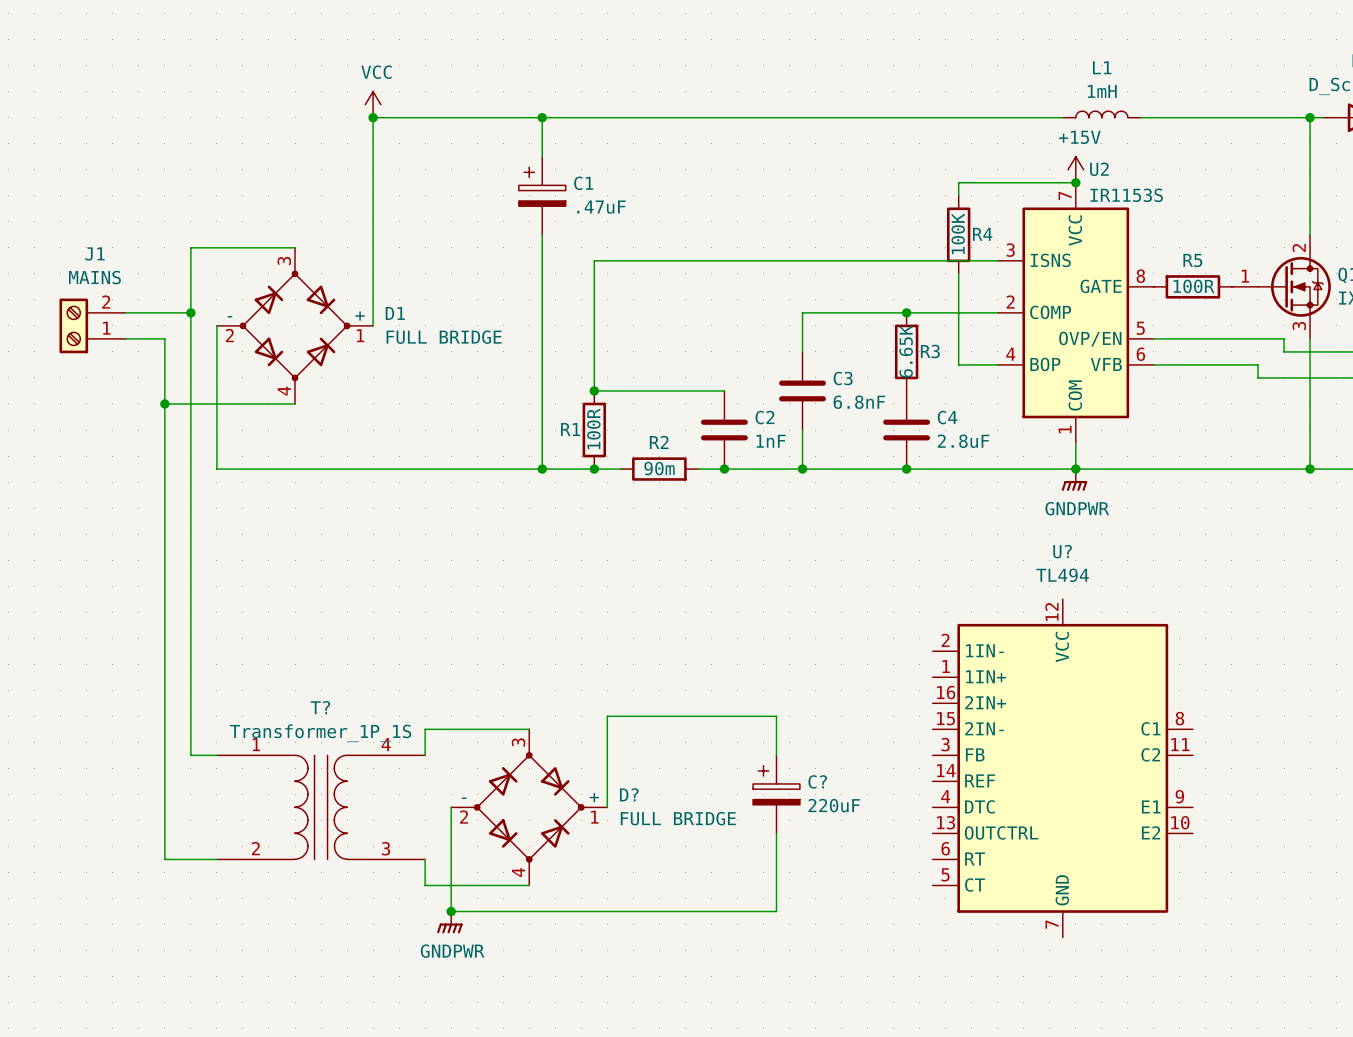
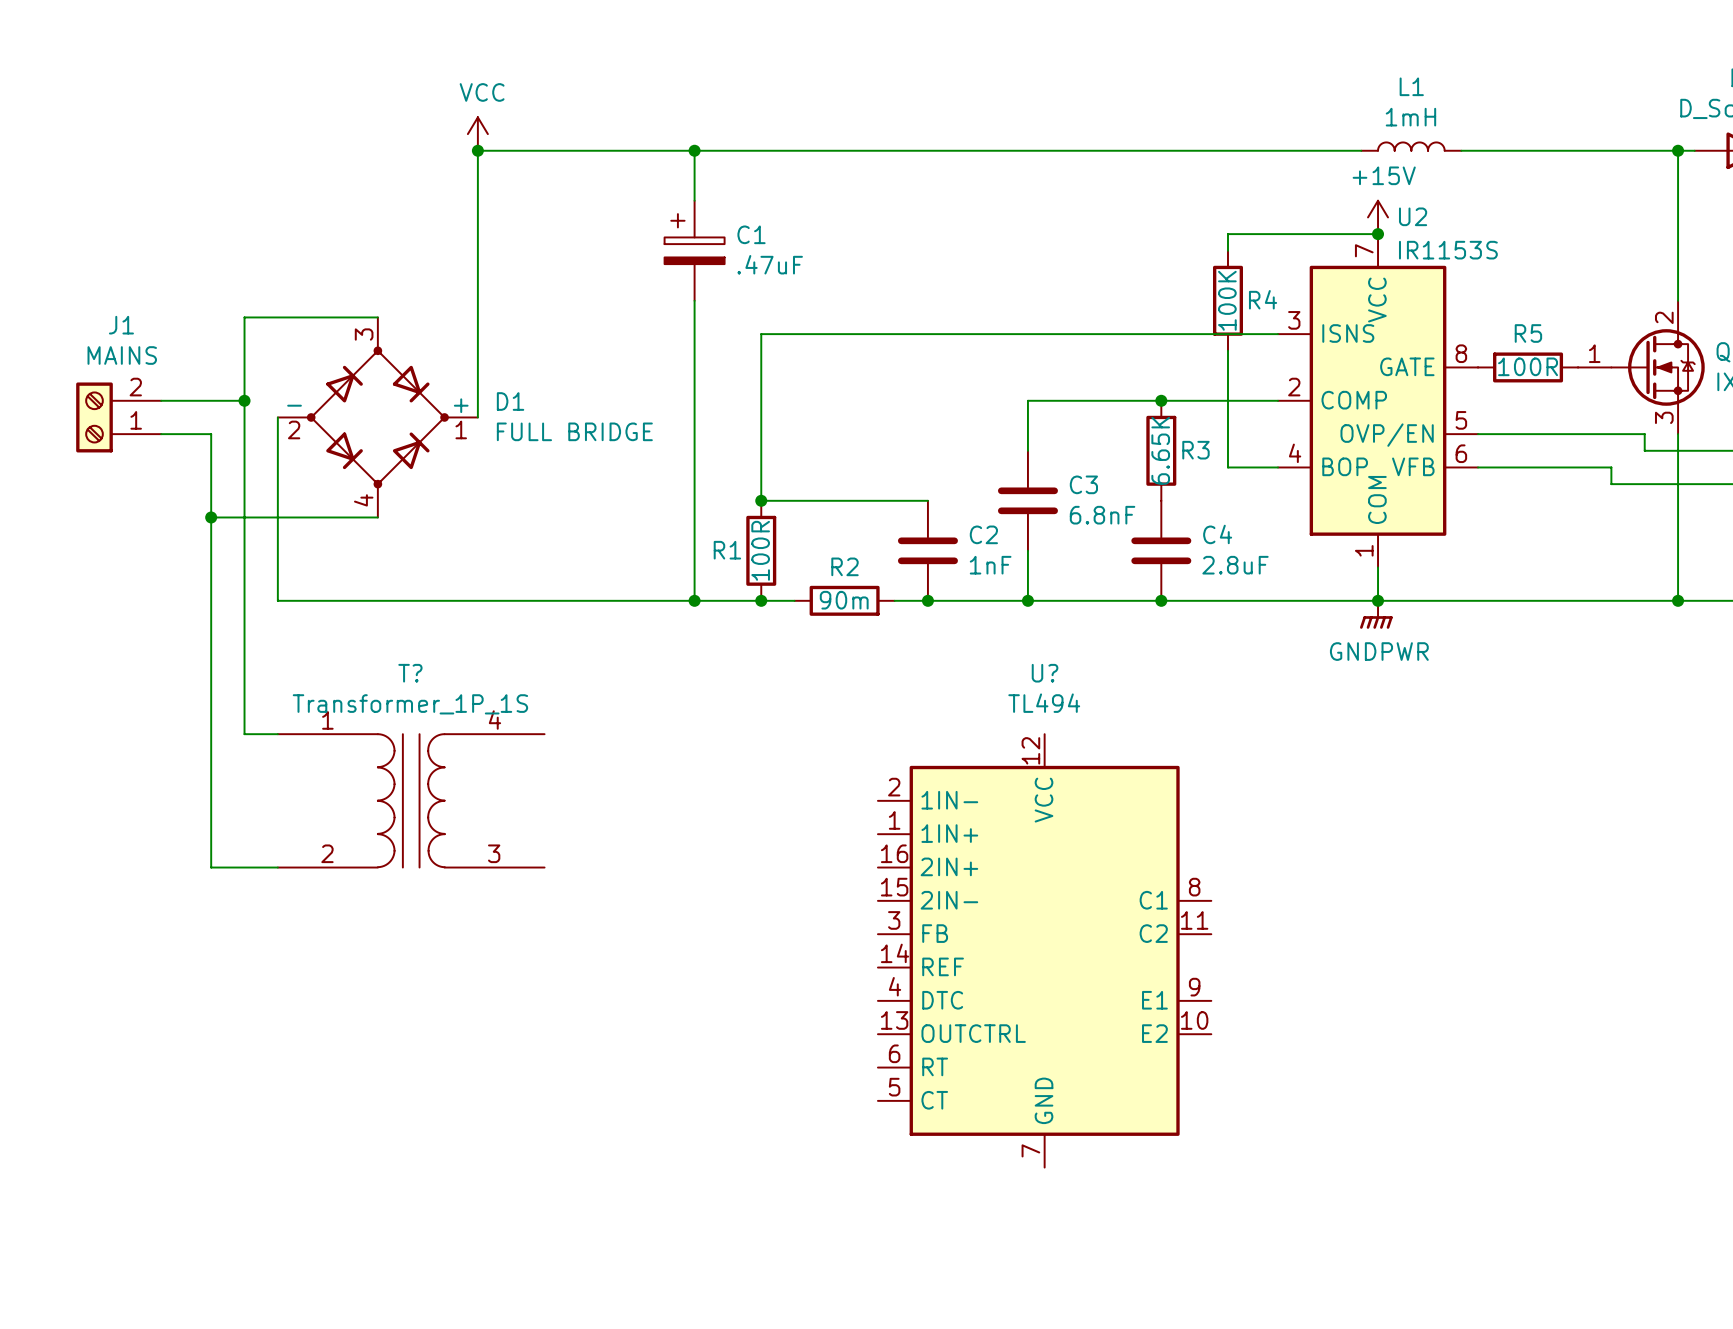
wire: (190, 573) (190, 755) (216, 755) -> (244, 734) (277, 734)
wire: (164, 677) (164, 859) (216, 859) -> (211, 867) (277, 867)
wire: (529, 729) (425, 729) (425, 755) -> none
wire: (776, 755) (776, 716) (607, 716) (607, 807) -> none
U? position: (1062, 768) -> (1044, 950)
C?: 220uF (776, 794) -> none
T? position: (321, 807) -> (411, 800)
wire: (451, 807) (451, 911) (776, 911) (776, 833) -> none
D?: FULL BRIDGE (529, 807) -> none
wire: (425, 859) (425, 885) (529, 885) -> none
junction: (451, 911) -> none
power symbol: GNDPWR (449, 922) -> none

